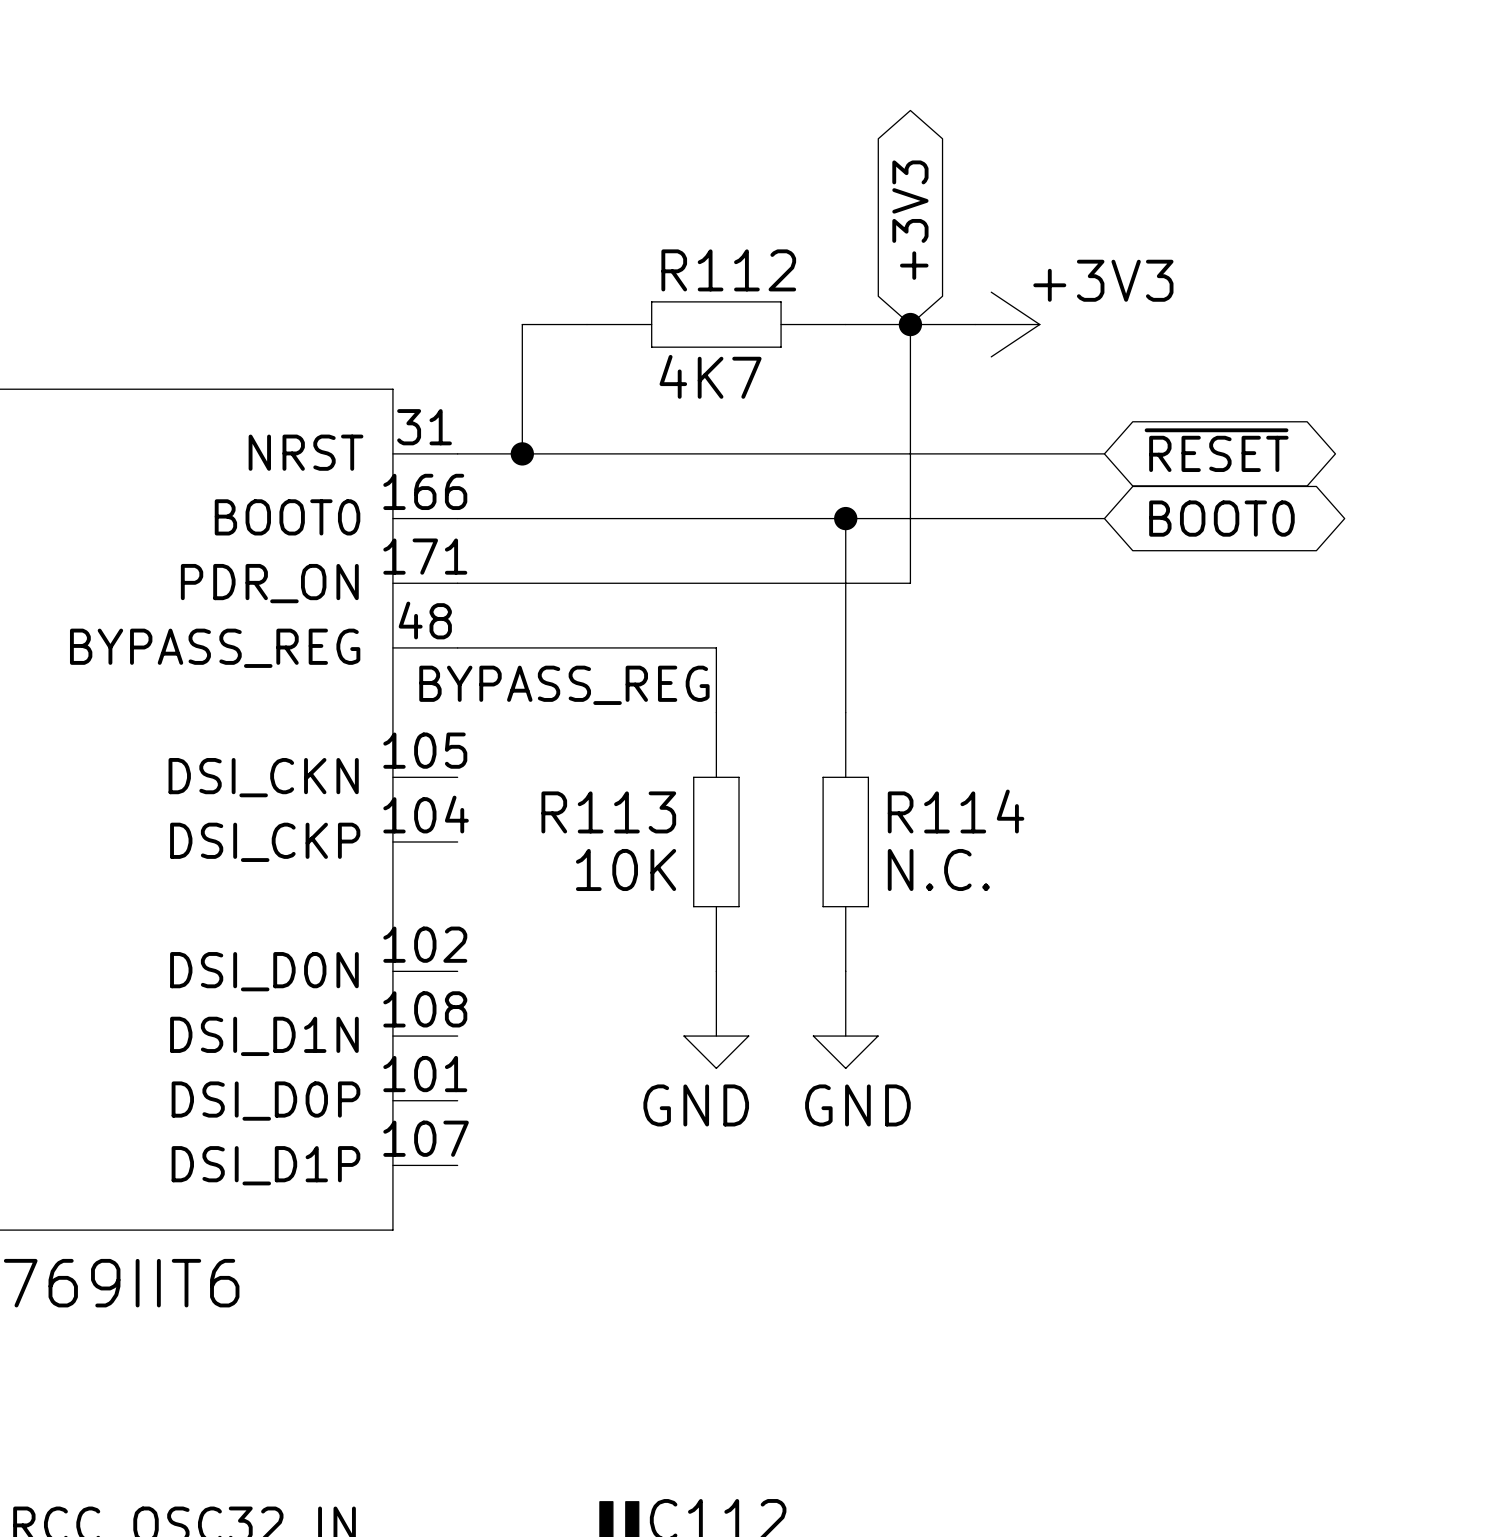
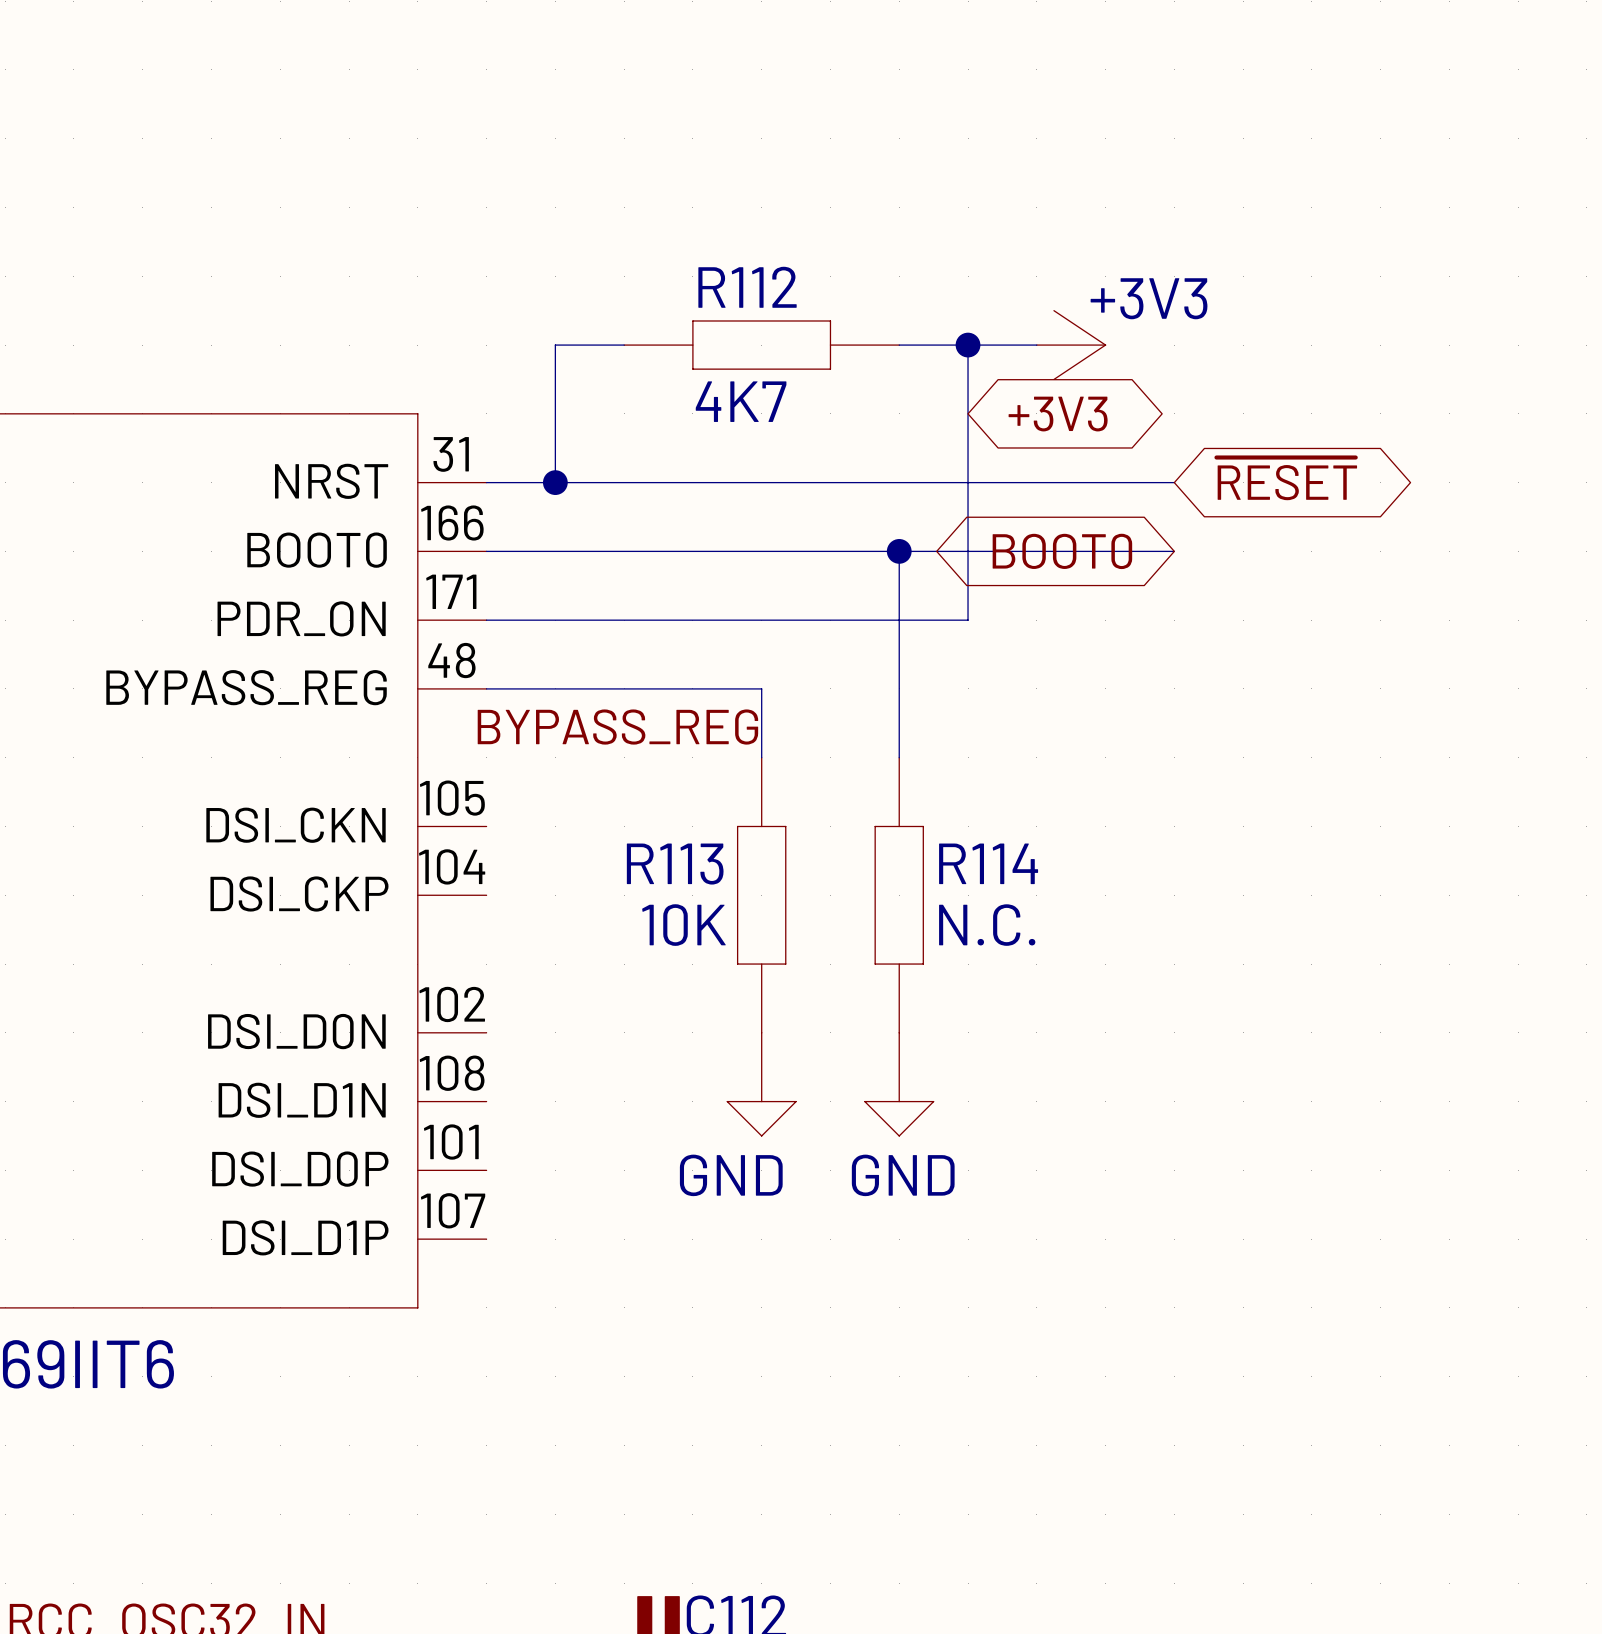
global label rotation: 0° (910, 220) -> 90° clockwise (1058, 414)
global label rotation: 0° (1221, 518) -> 180° (1062, 551)

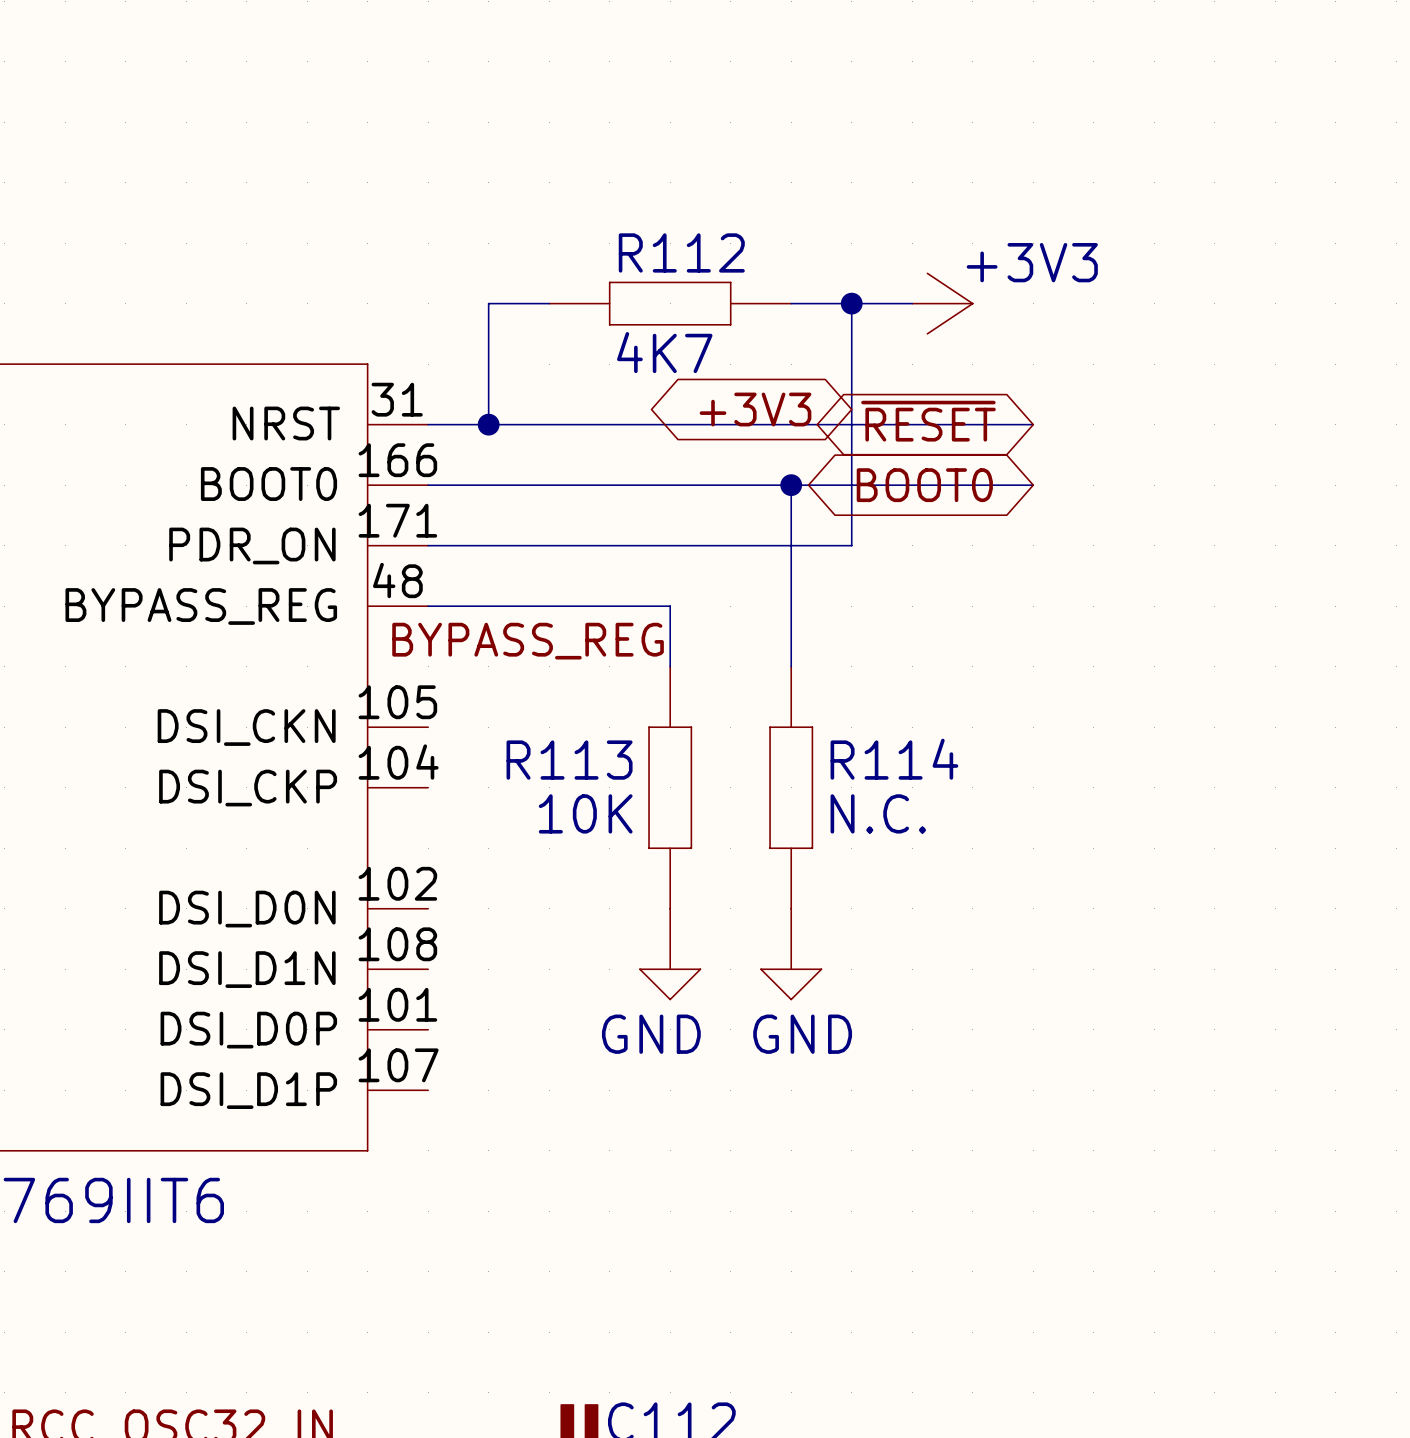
global label rotation: 0° (1058, 414) -> 180° (755, 409)
global label position: +3V3 (1058, 414) -> +3V3 (755, 409)
global label rotation: 0° (1286, 478) -> 180° (928, 421)

